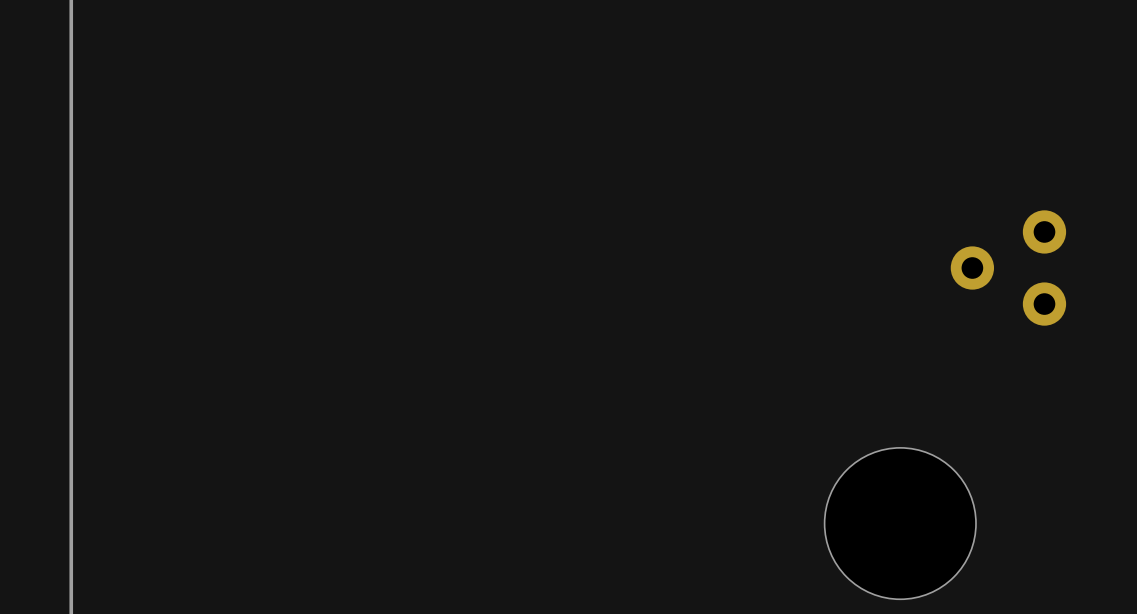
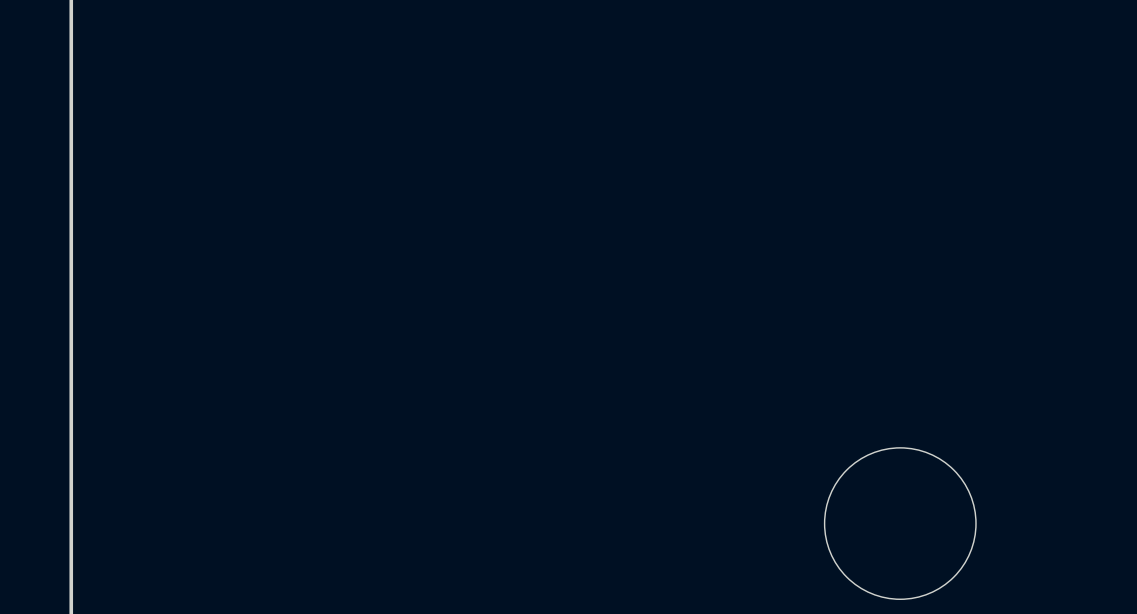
via: (1044, 231) -> none
via: (972, 268) -> none
via: (1044, 304) -> none

